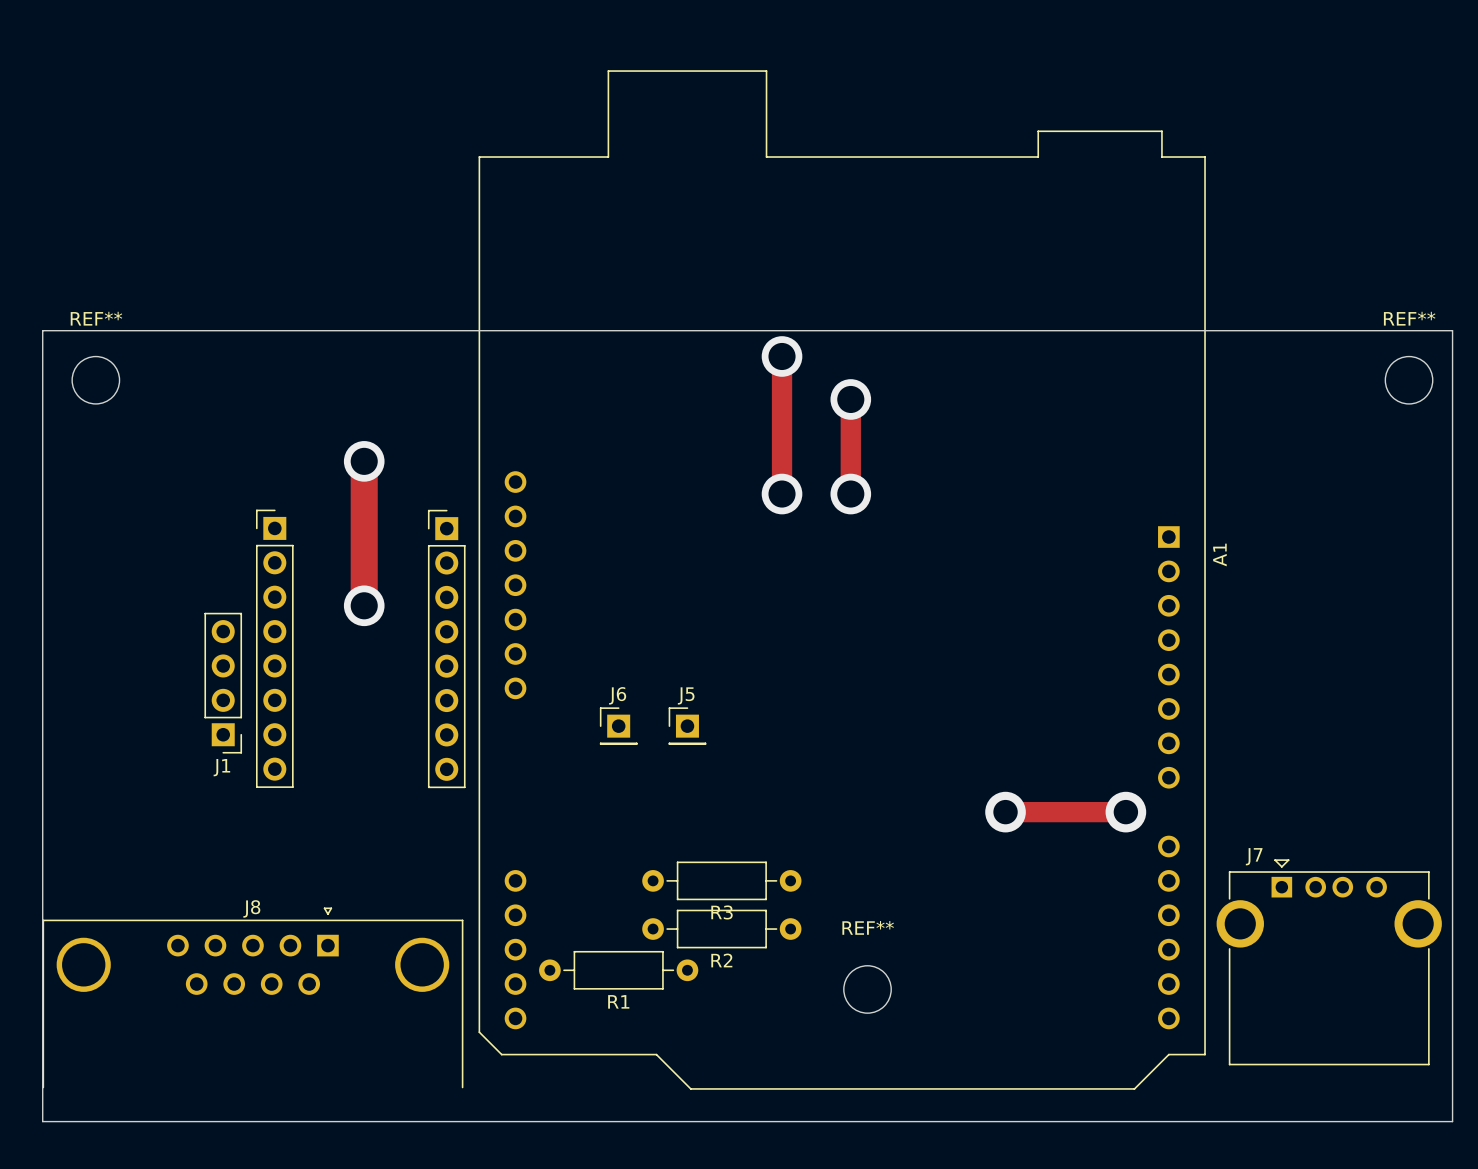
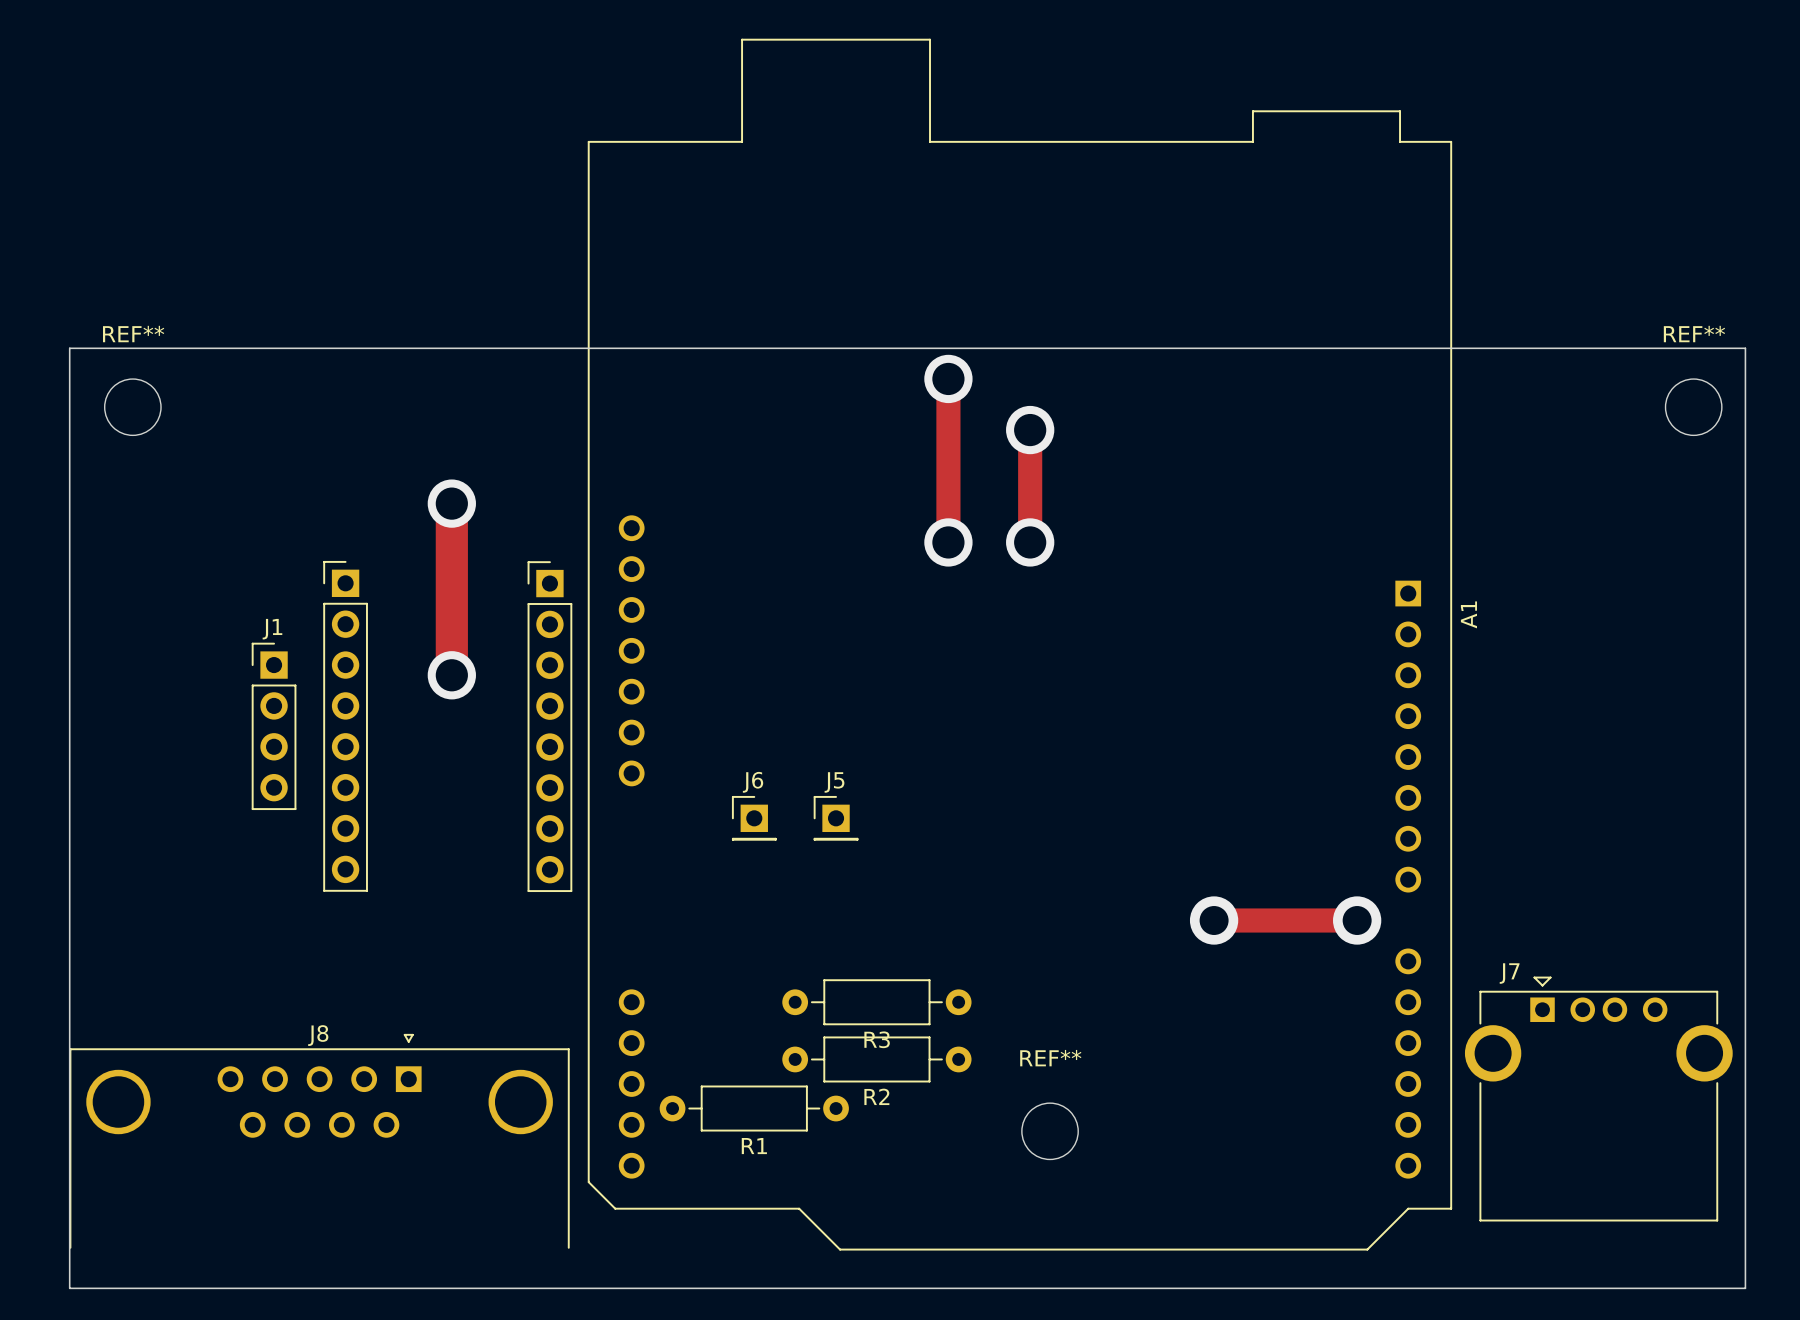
J1 rotation: 0° (223, 683) -> 180° (274, 726)

